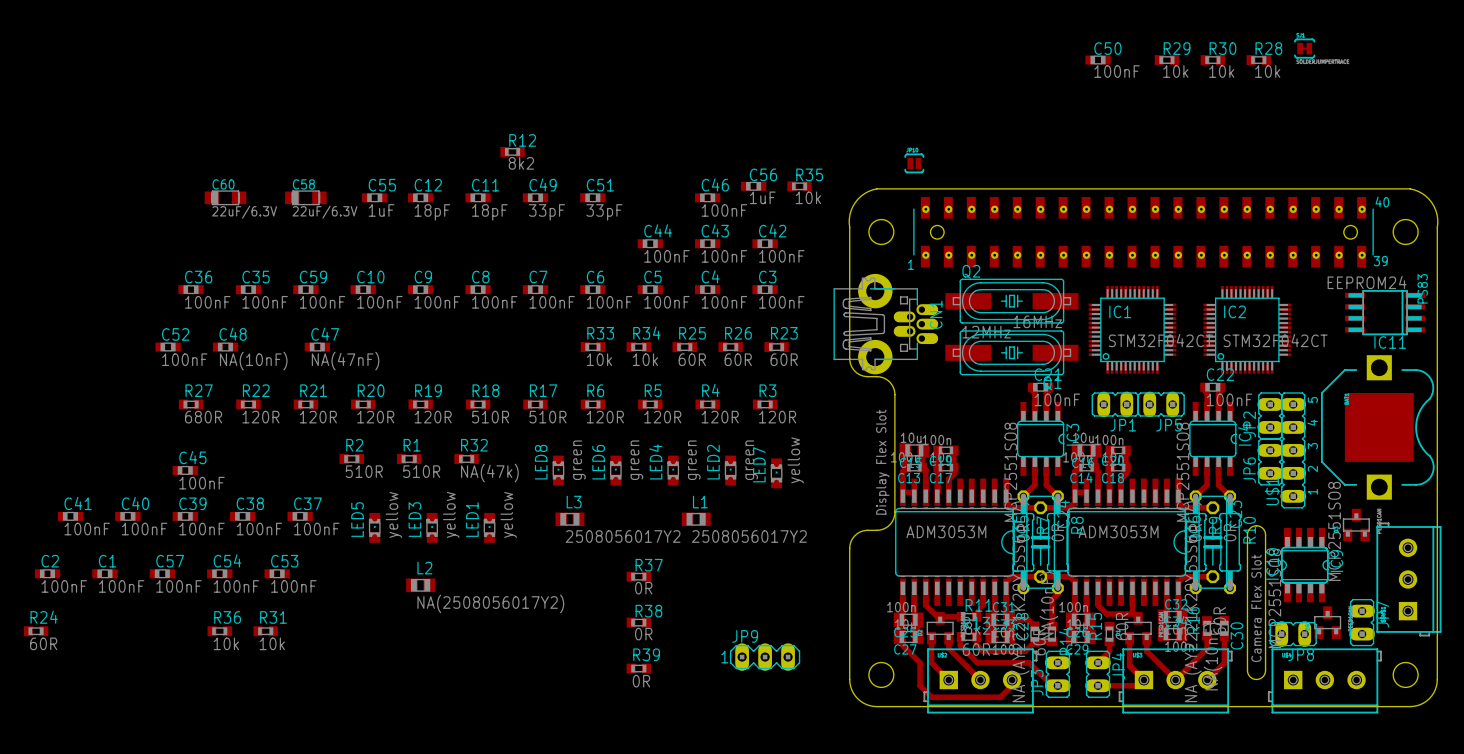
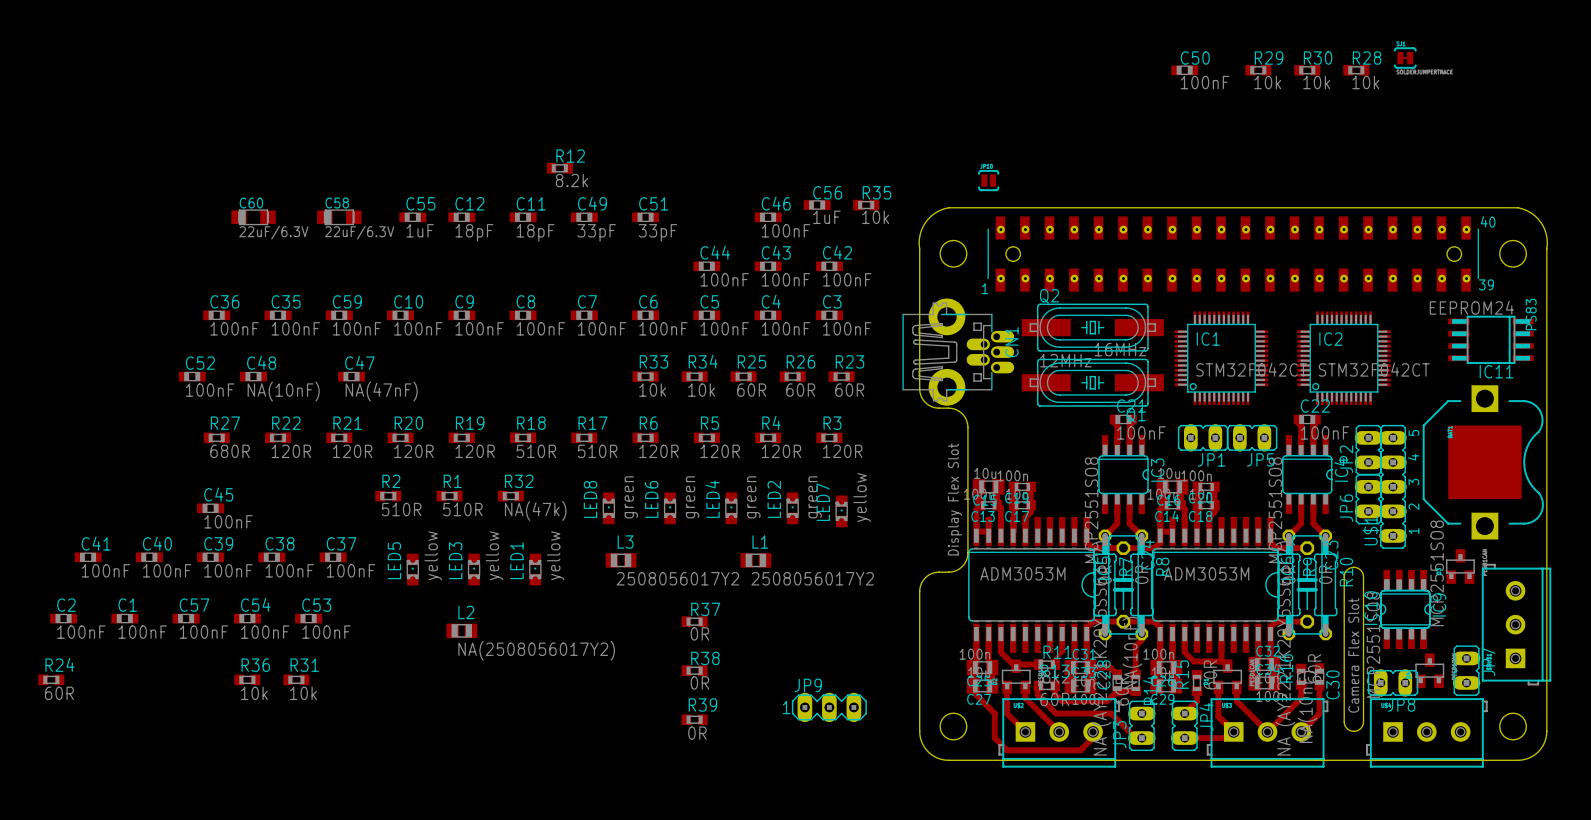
R12 value: 8k2 (521, 163) -> 8.2k (571, 180)

